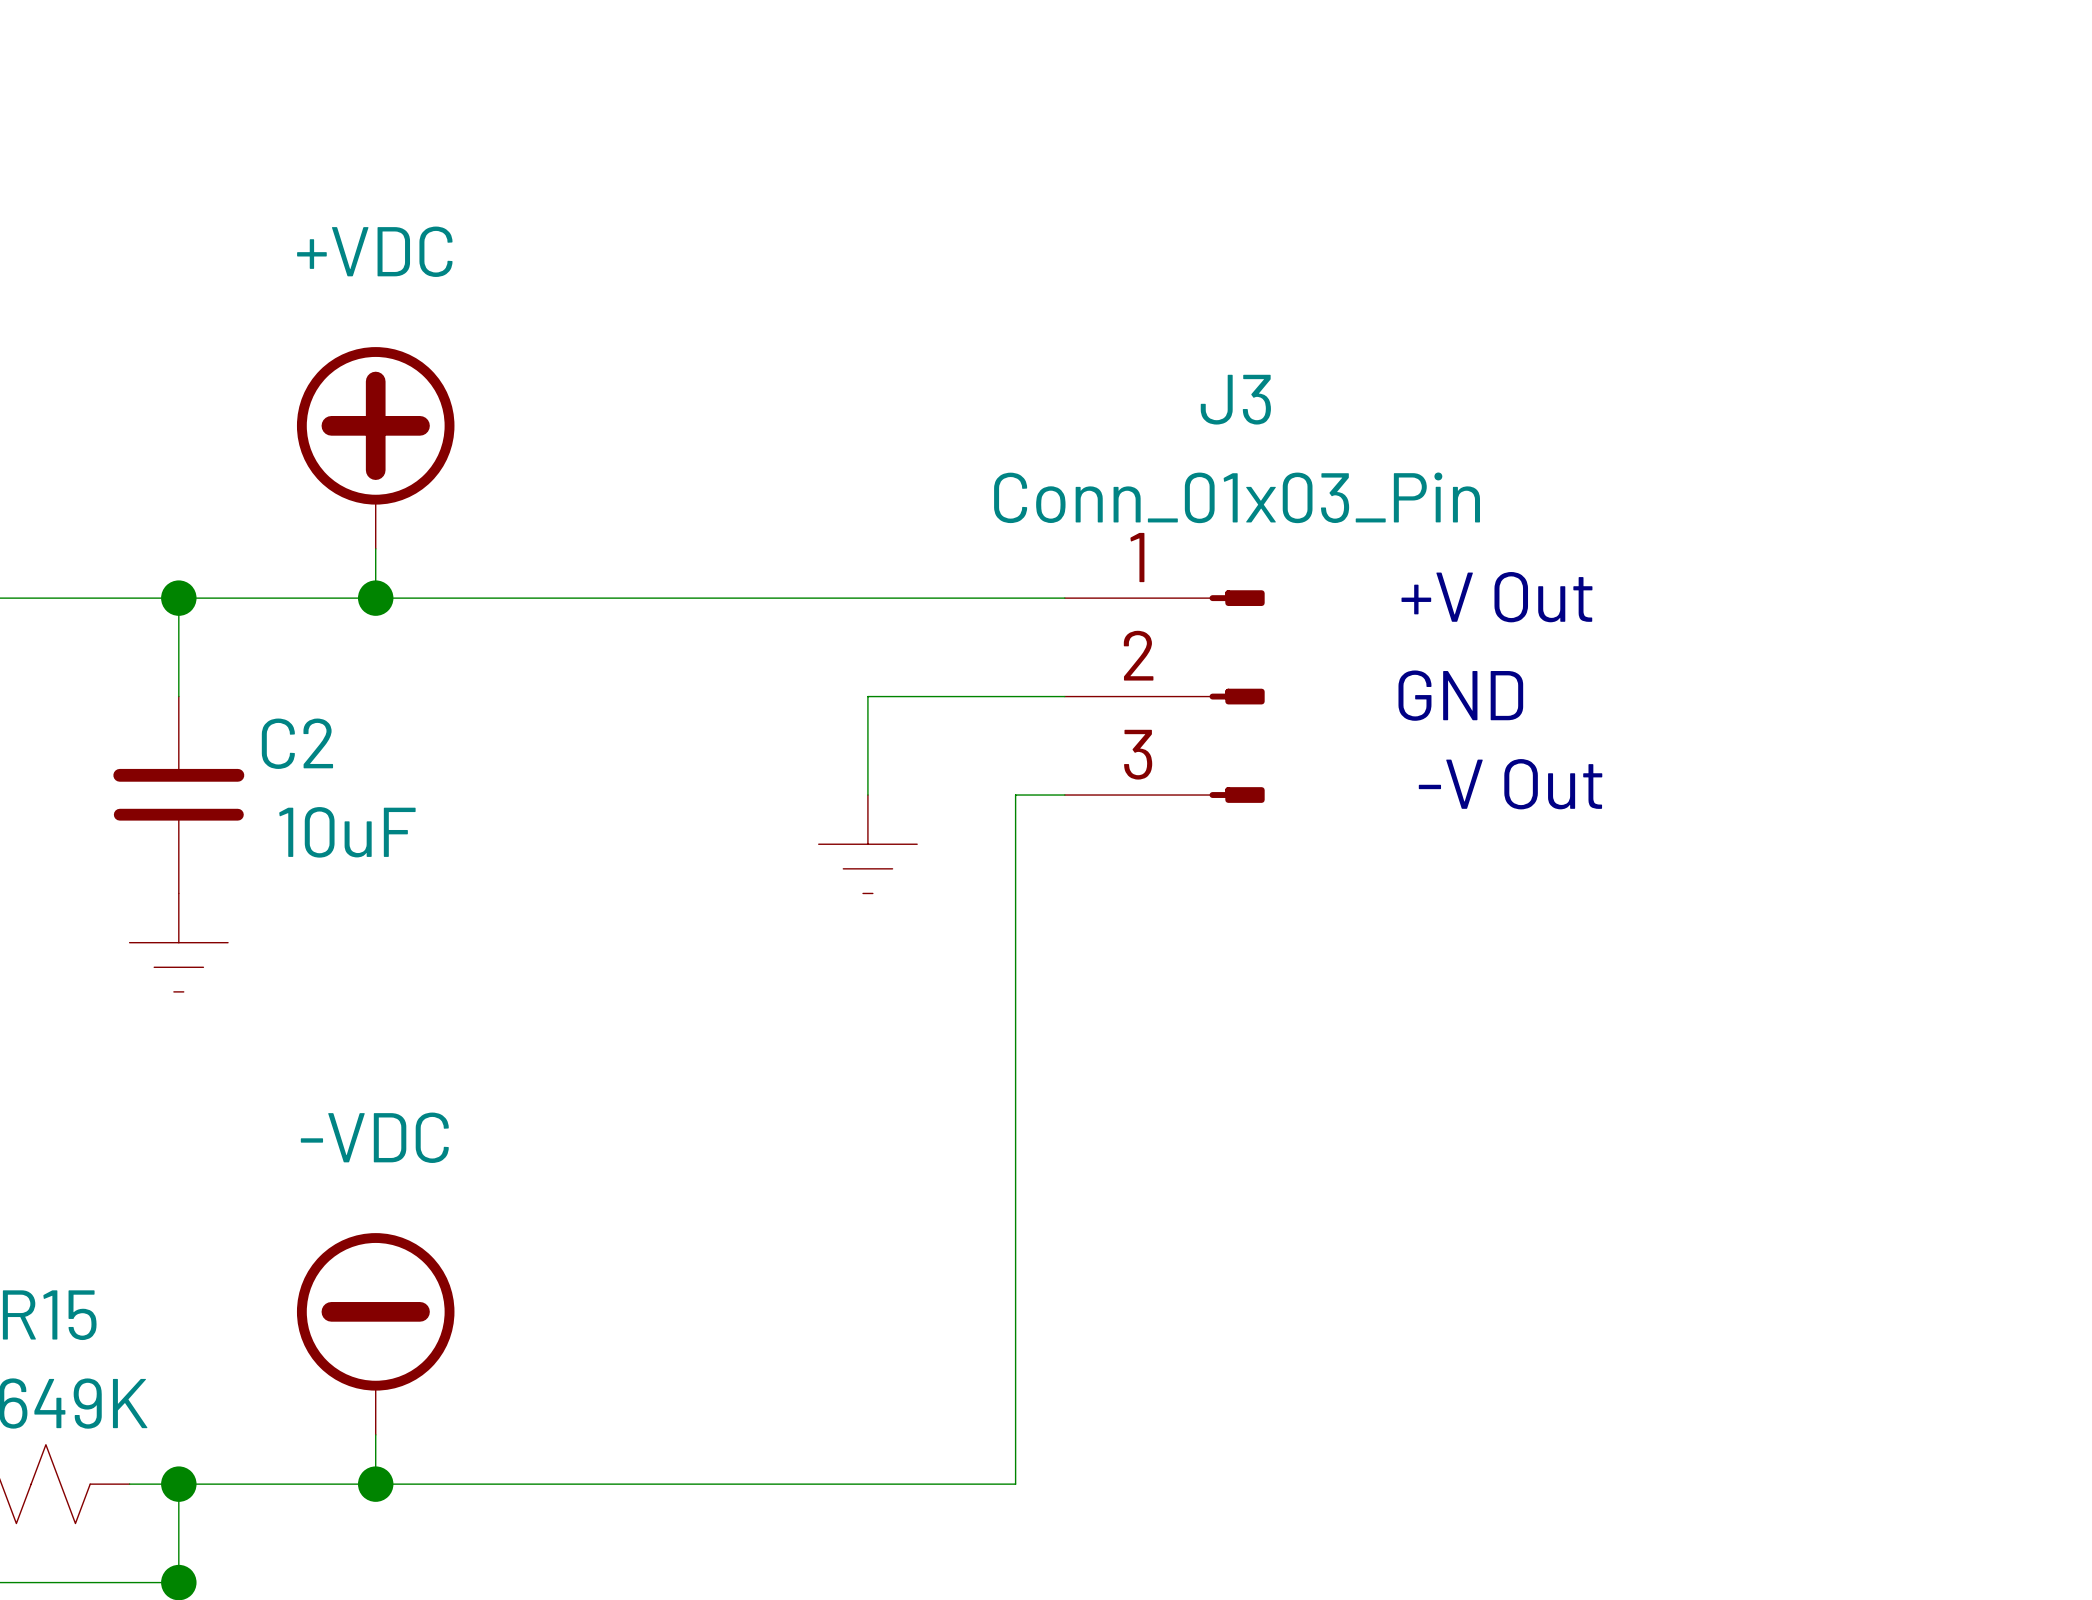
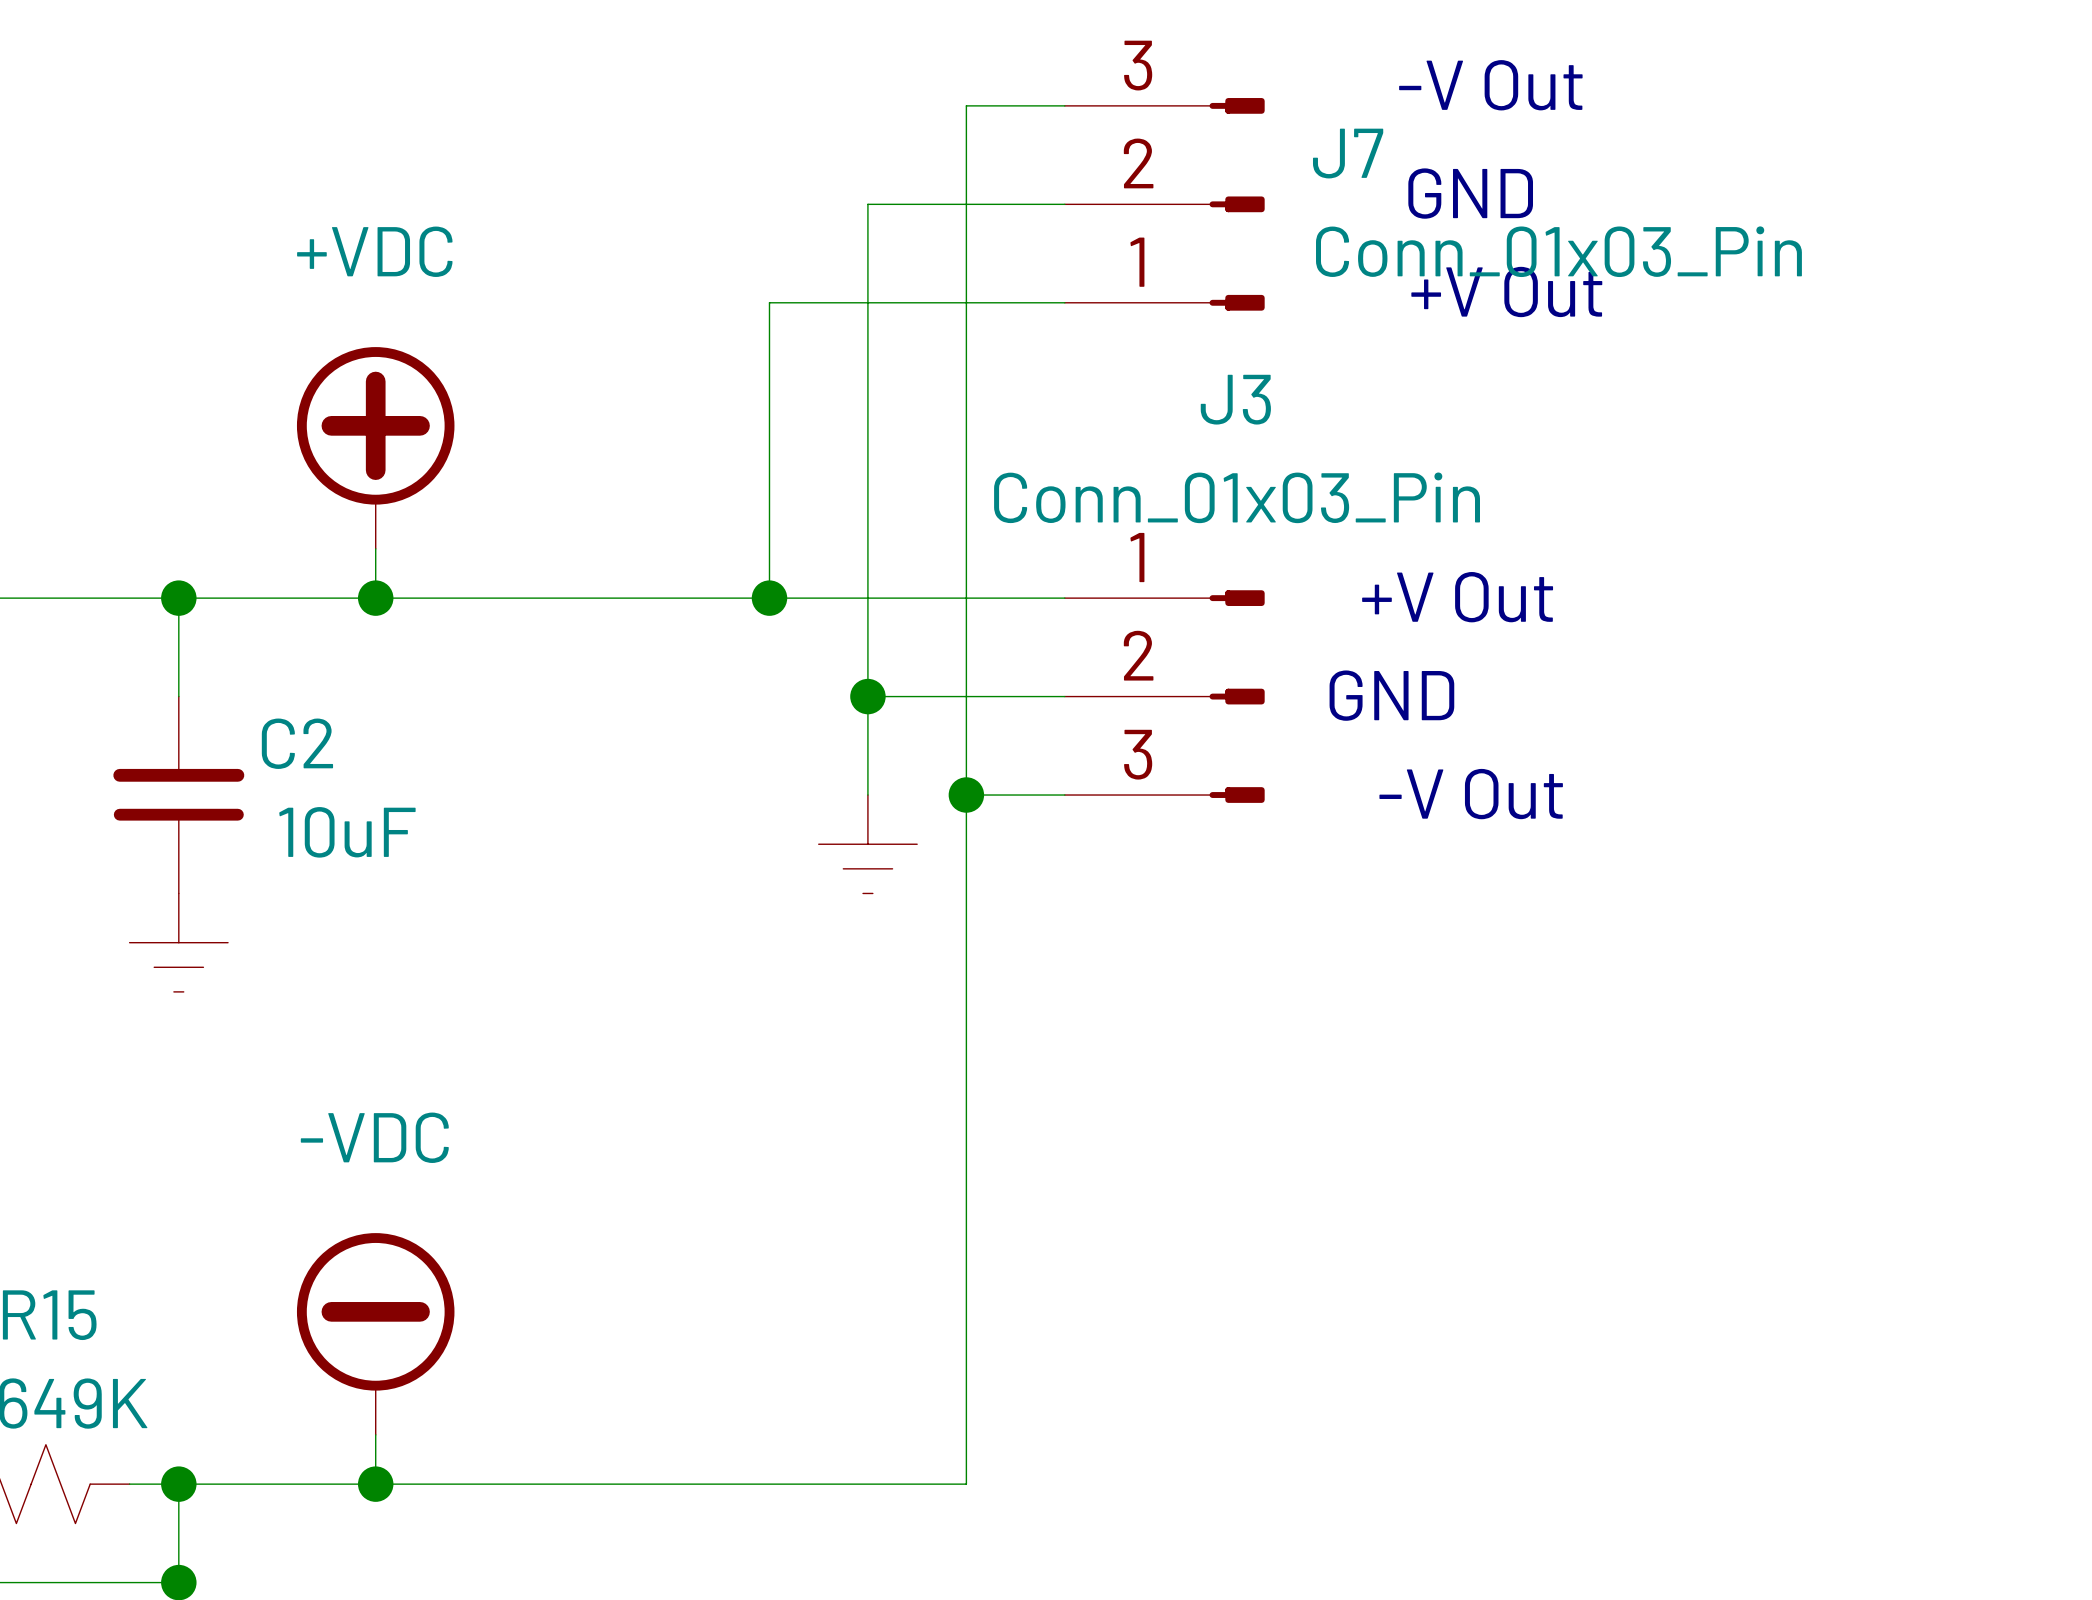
text: none -> -V Out (1490, 85)
wire: none -> (1064, 105) (966, 105) (966, 1484)
text: none -> GND (1470, 193)
wire: none -> (1064, 204) (867, 204) (867, 696)
J7: none -> Conn_01x03_Pin (1164, 204)
text: none -> +V Out (1506, 291)
wire: none -> (1064, 302) (769, 302) (769, 598)
text position: +V Out (1496, 597) -> +V Out (1457, 597)
junction: none -> (769, 598)
text position: GND (1460, 695) -> GND (1391, 695)
junction: none -> (867, 696)
text position: -V Out (1510, 784) -> -V Out (1471, 794)
junction: none -> (966, 795)
wire: (1015, 795) (1015, 1484) (966, 1484) -> (1015, 795) (966, 795)

